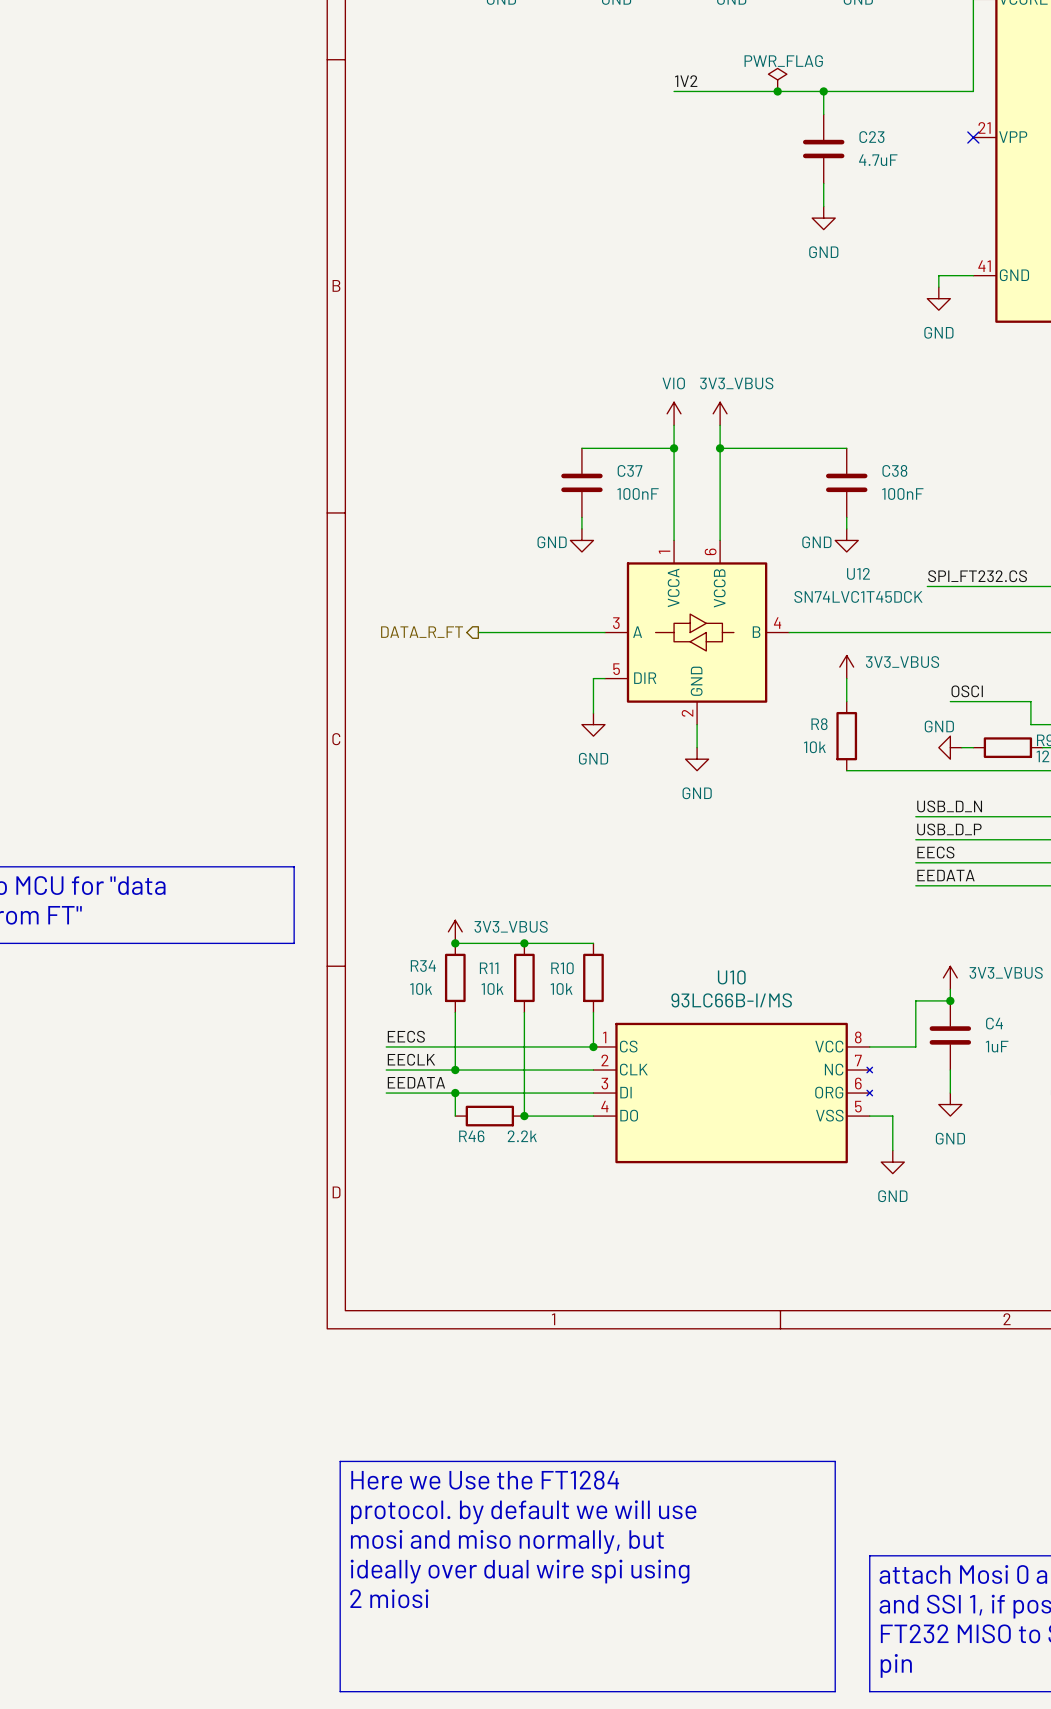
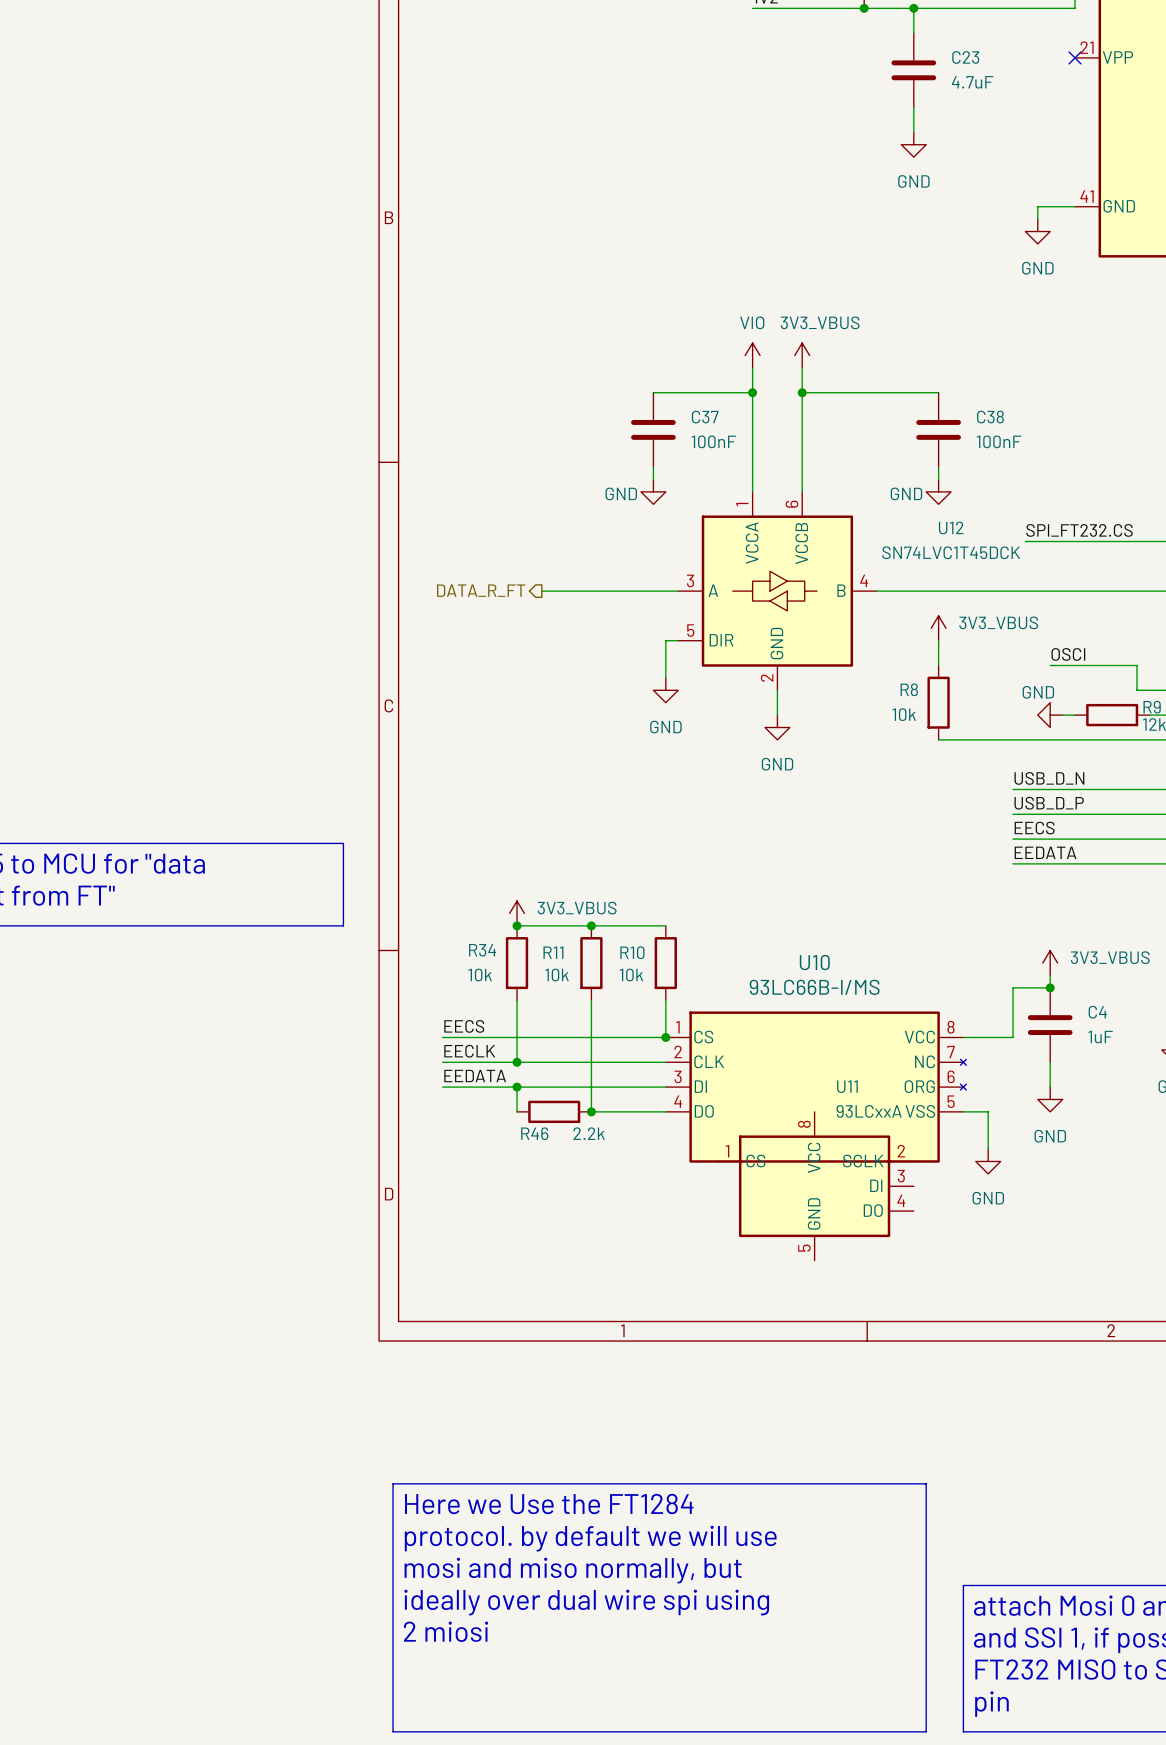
U11: none -> 93LCxxA (814, 1186)

